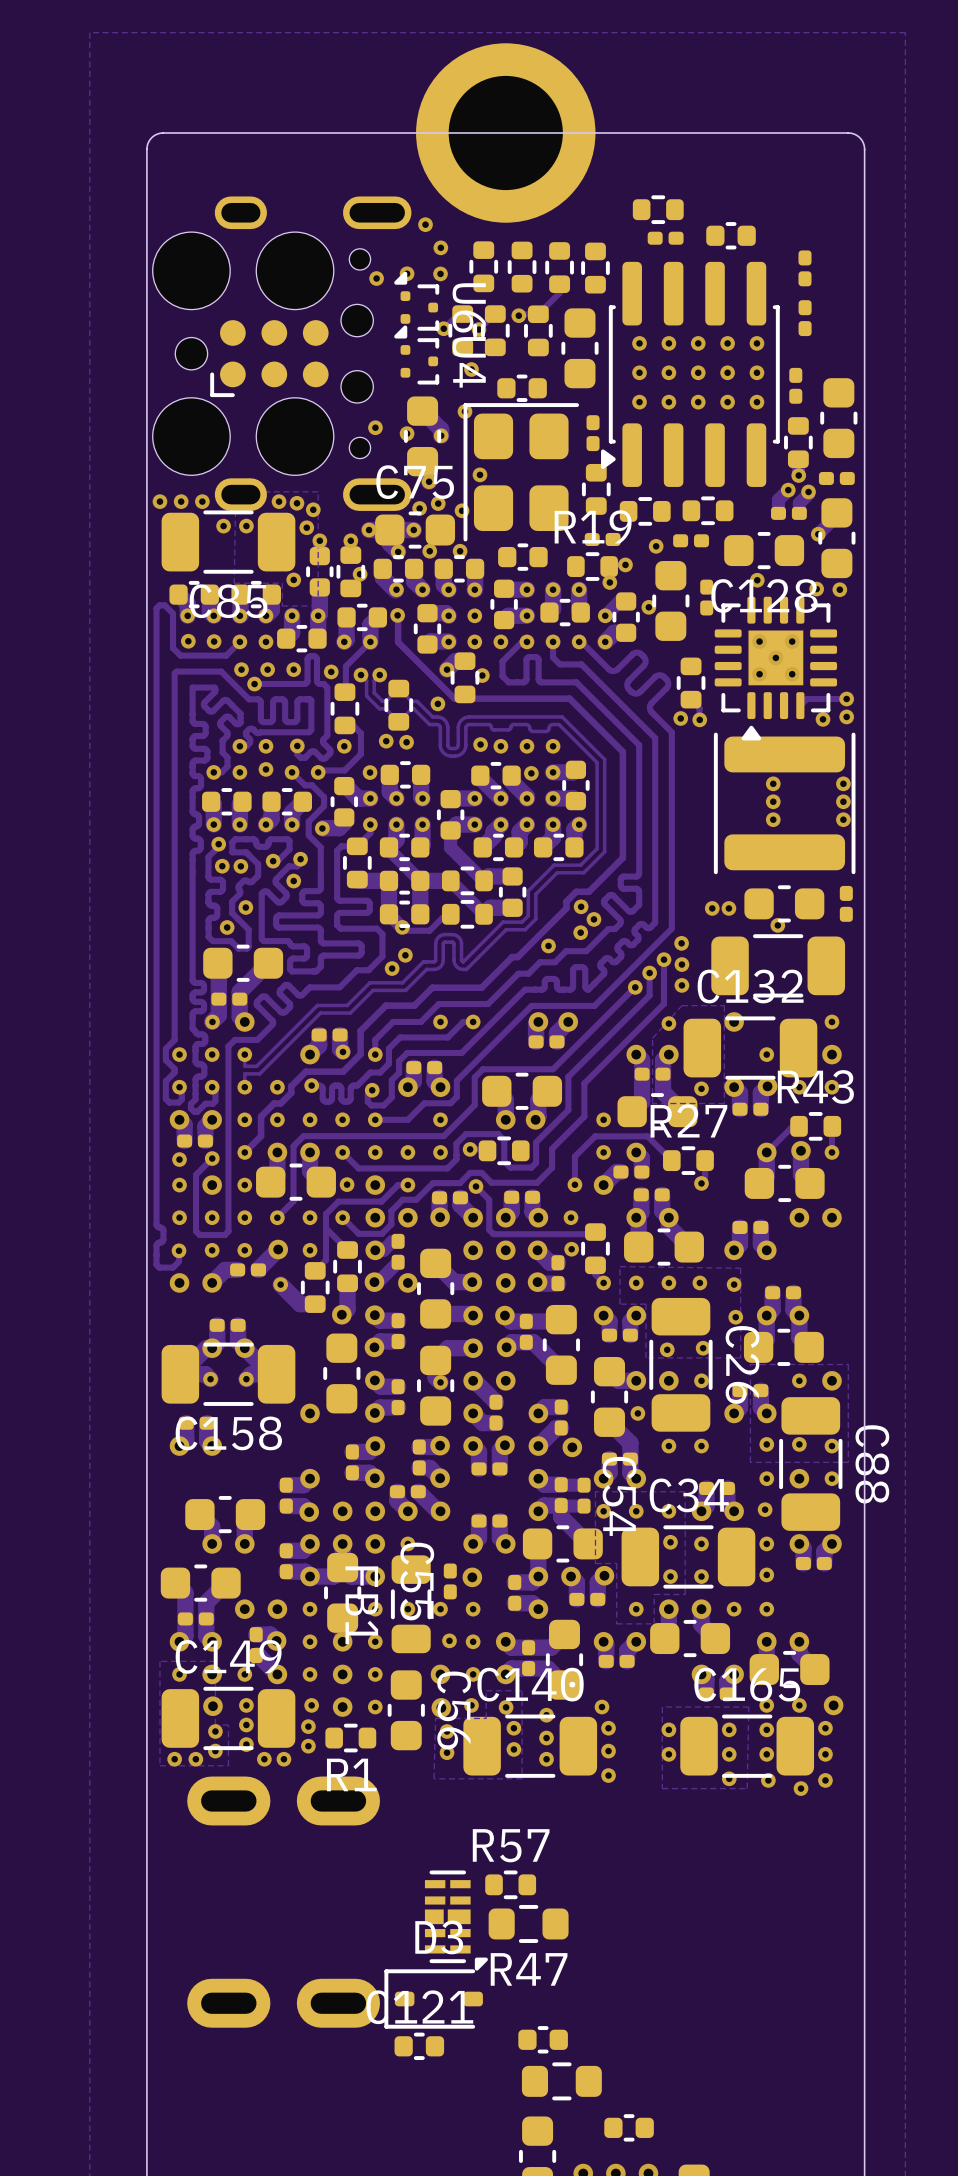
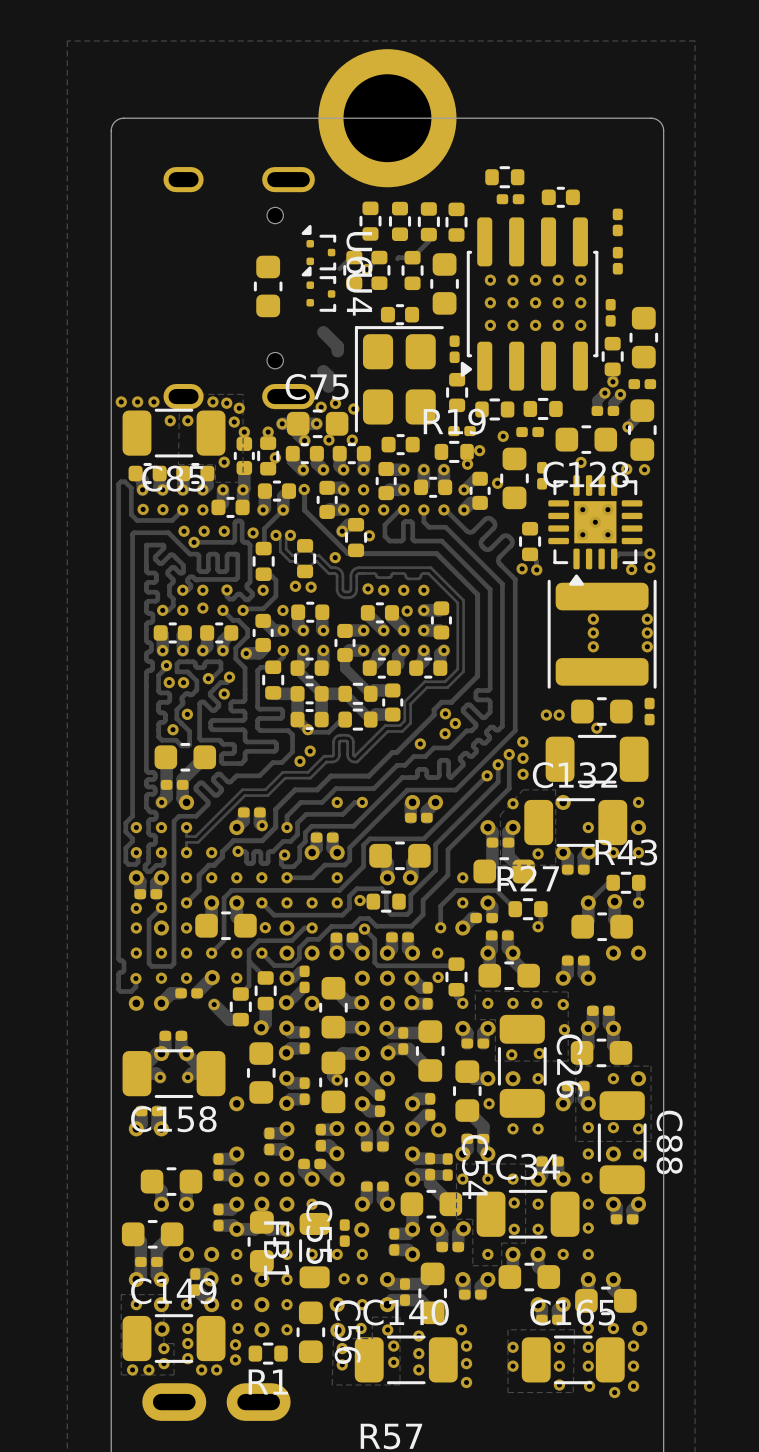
via: (425, 224) -> none
via: (440, 247) -> none
via: (407, 273) -> none
via: (440, 273) -> none
via: (376, 278) -> none
via: (518, 315) -> none
via: (443, 328) -> none
part: (263, 353) -> none
via: (471, 369) -> none
via: (464, 411) -> none
via: (375, 427) -> none
via: (407, 433) -> none
via: (441, 435) -> none
part position: (422, 436) -> (268, 286)
via: (479, 474) -> none
via: (429, 481) -> none

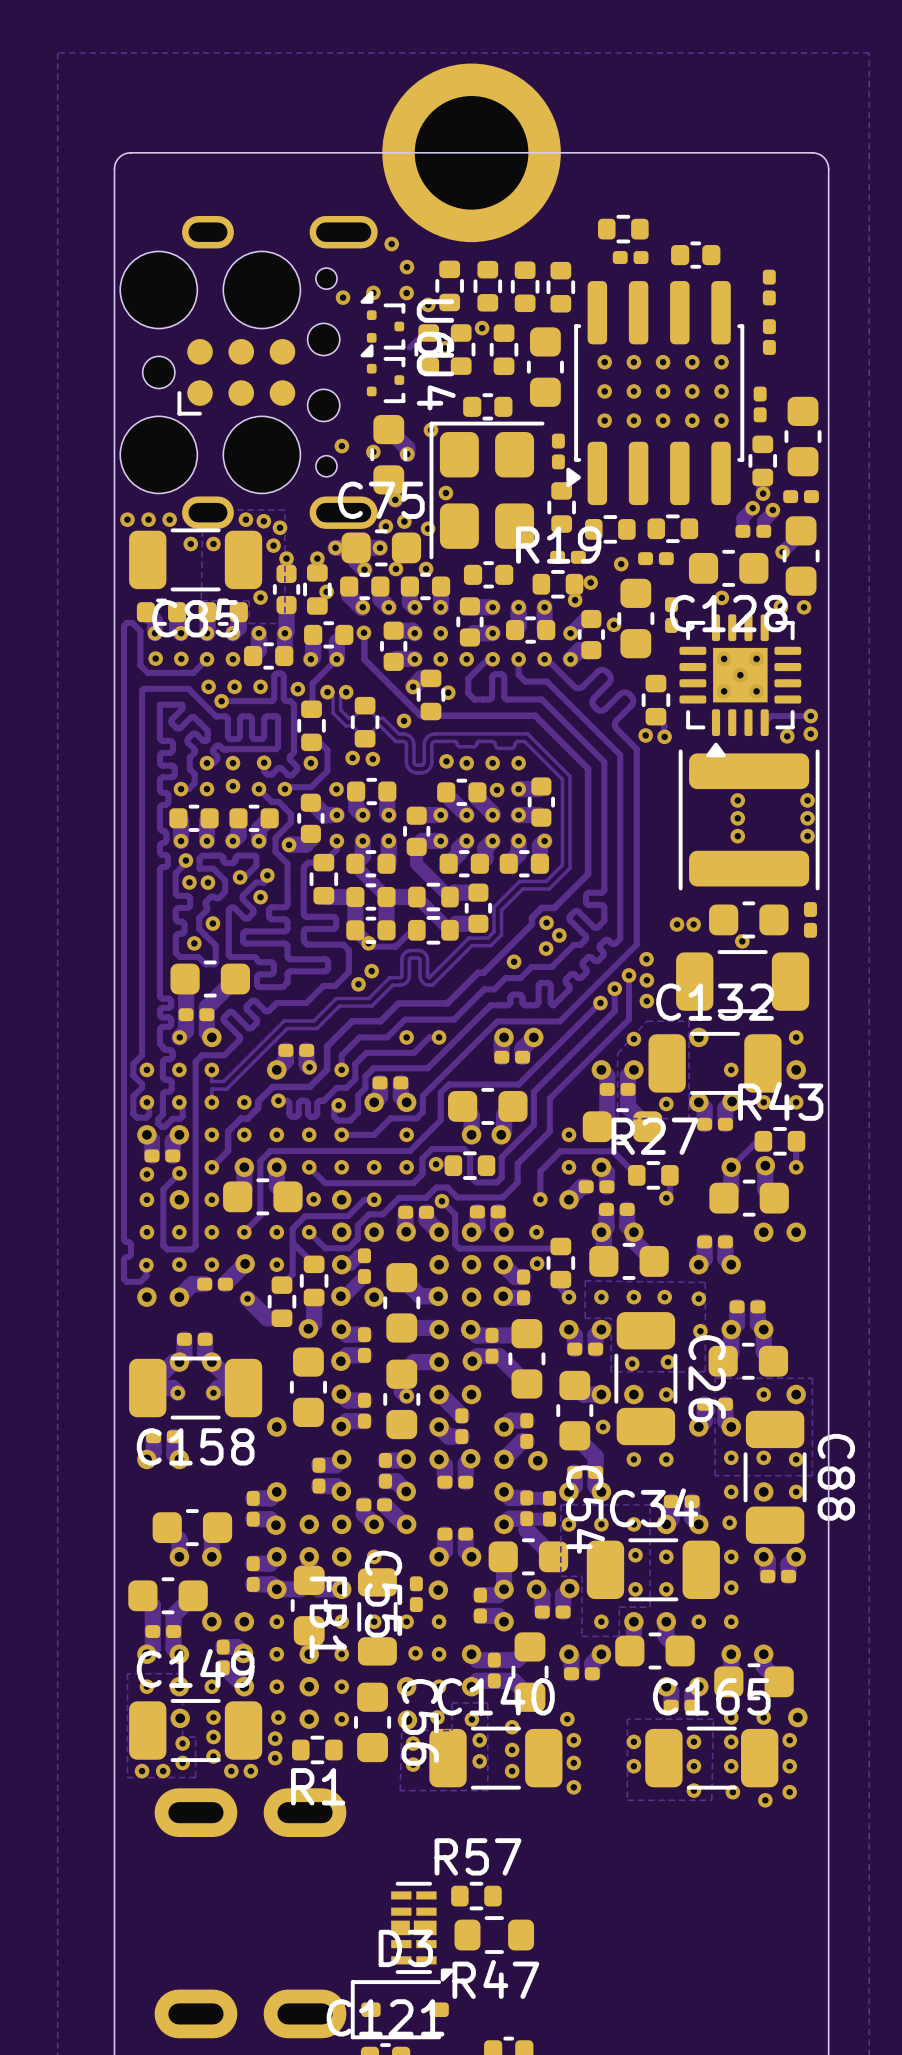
via: none -> (391, 244)
via: none -> (406, 267)
via: none -> (373, 292)
via: none -> (406, 293)
via: none -> (343, 297)
track: (428, 234) (428, 241) (412, 257) (397, 258) -> none
via: none -> (428, 304)
via: none -> (482, 328)
part position: (268, 286) -> (388, 454)
part: none -> (230, 372)
via: none -> (430, 430)
via: none -> (341, 446)
via: none -> (373, 451)
via: none -> (407, 454)
via: none -> (445, 493)
via: none -> (395, 499)

